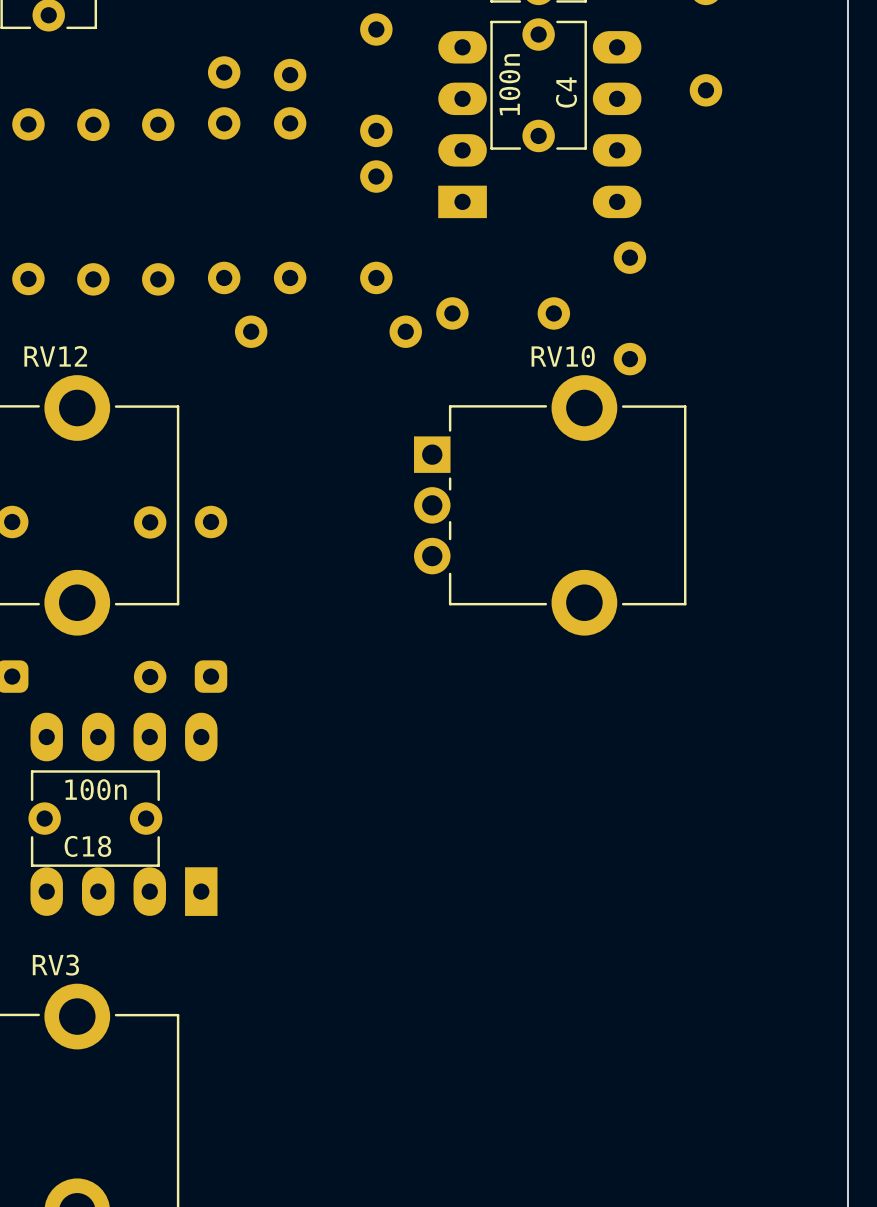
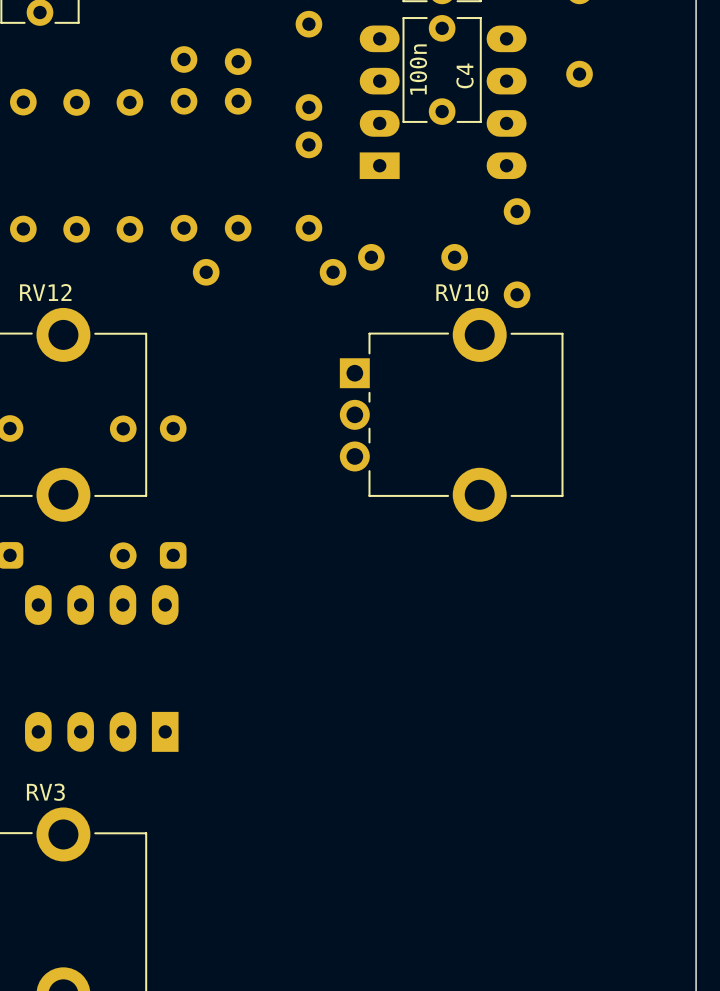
C18: 100n (95, 818) -> none

